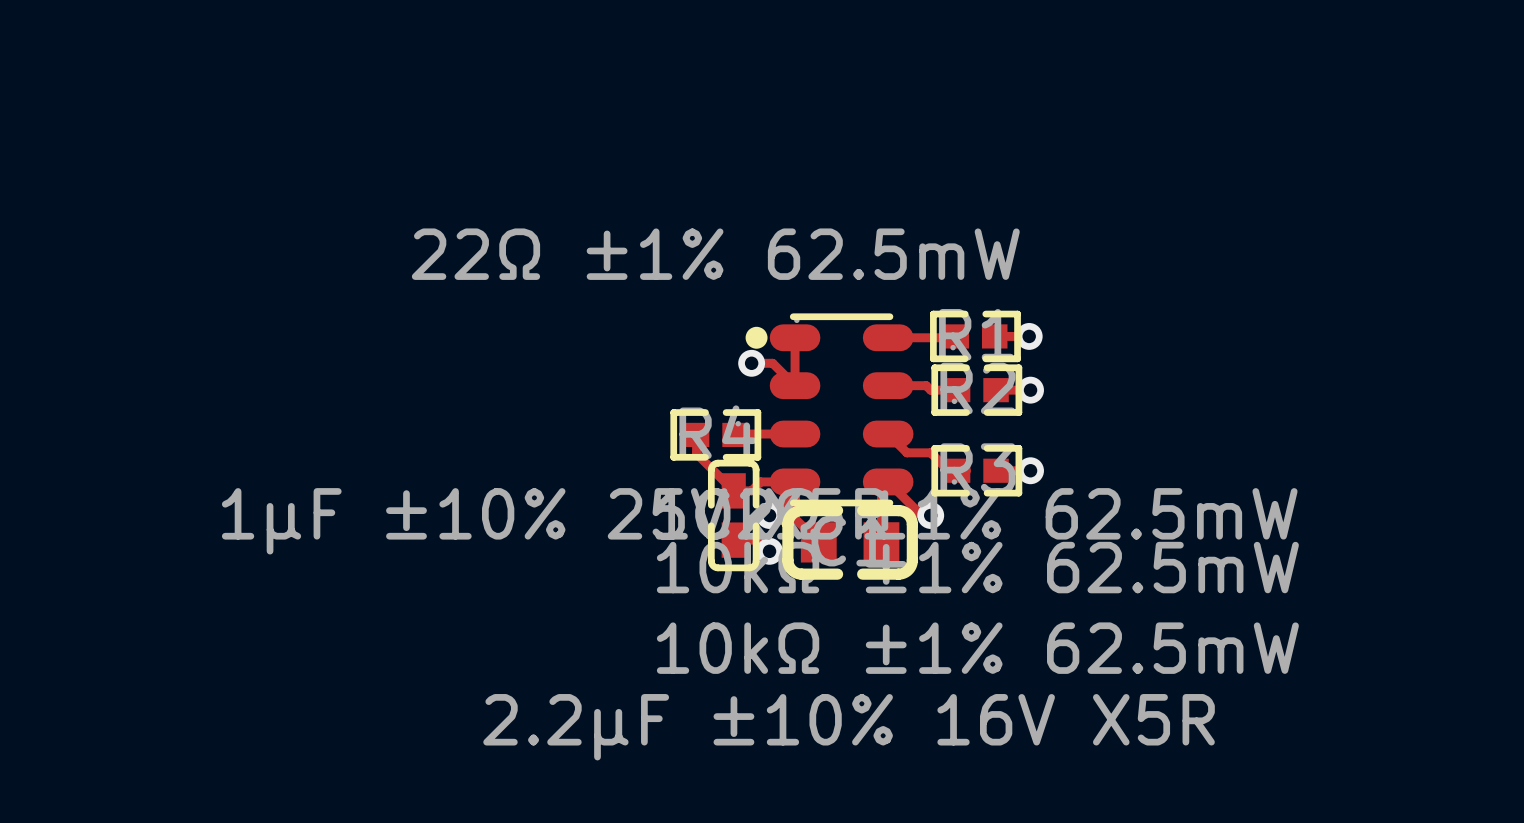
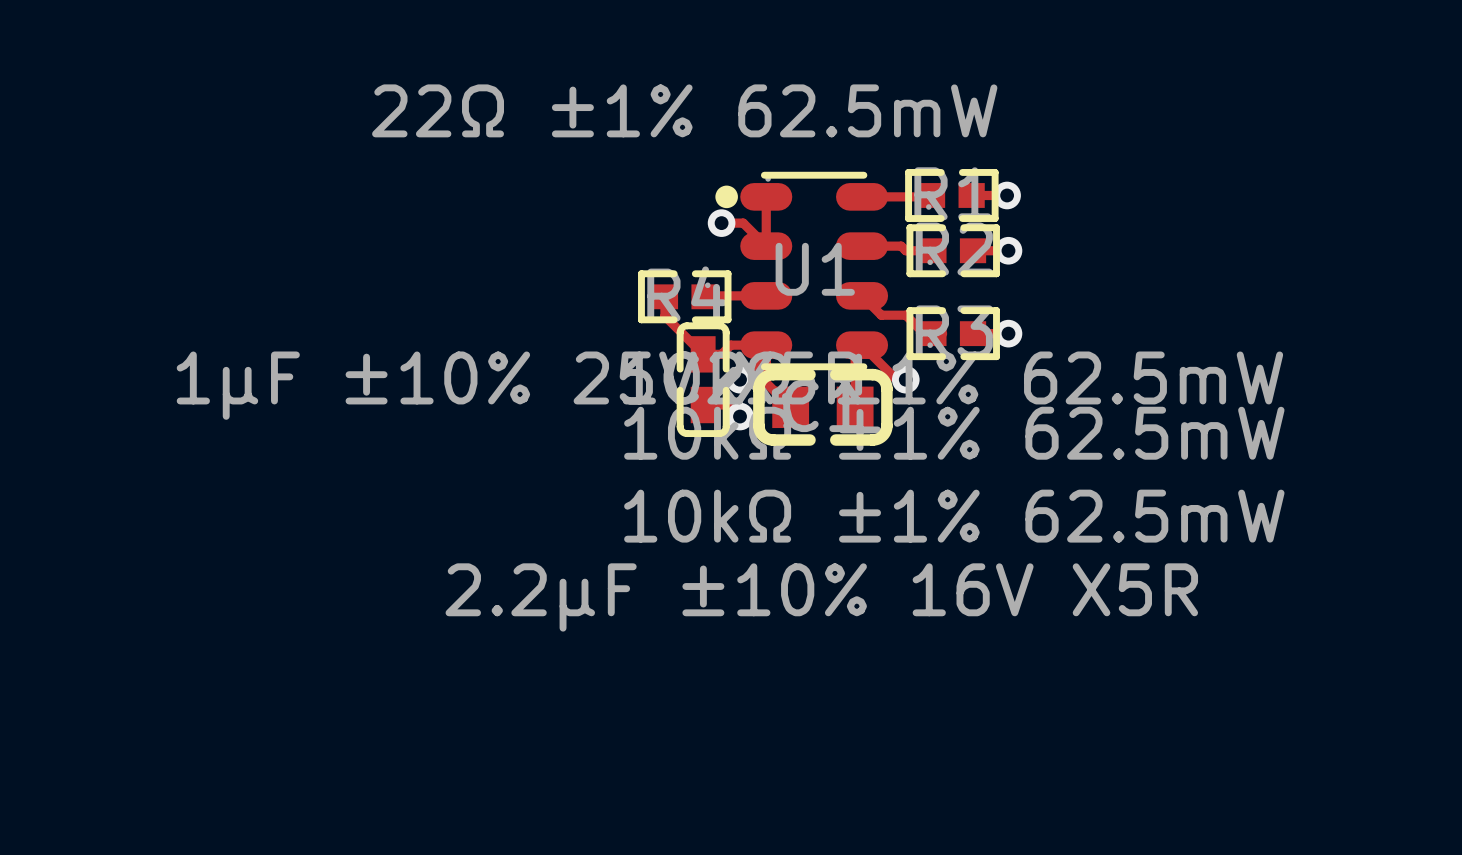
U1 name: none -> U1 (815, 269)

